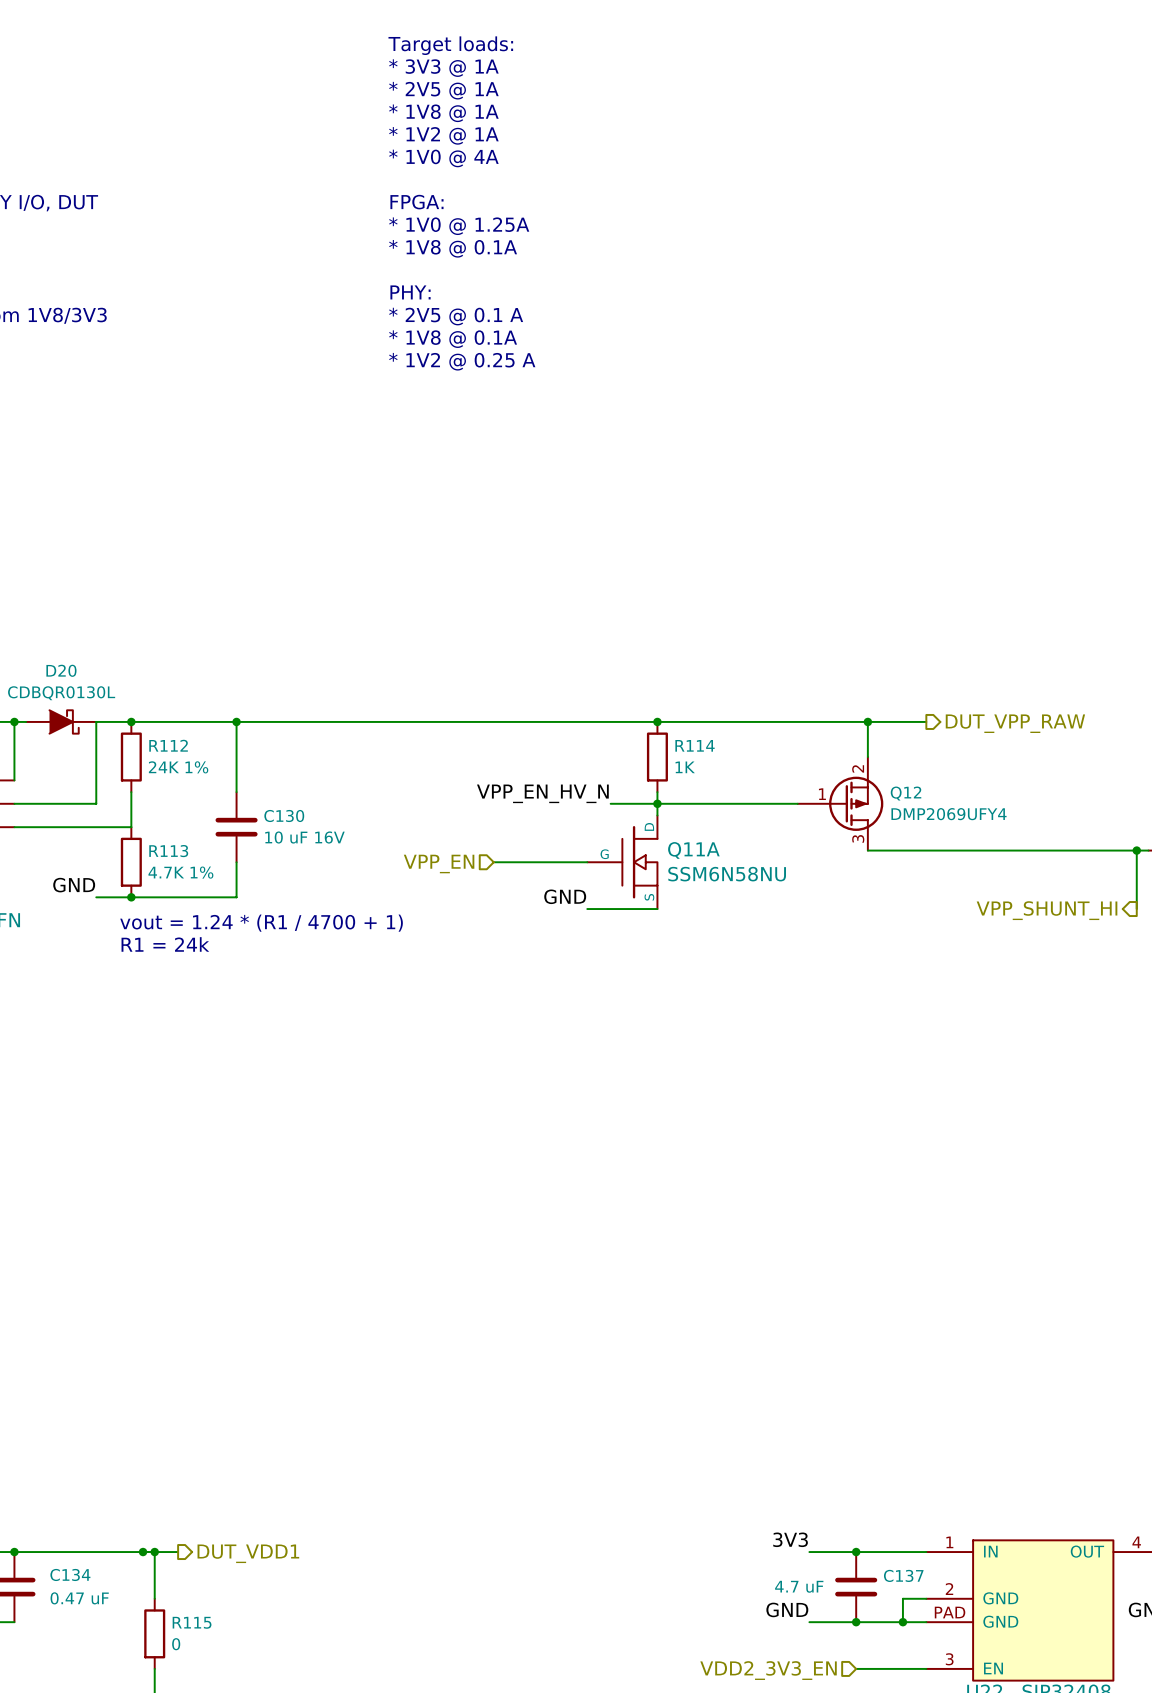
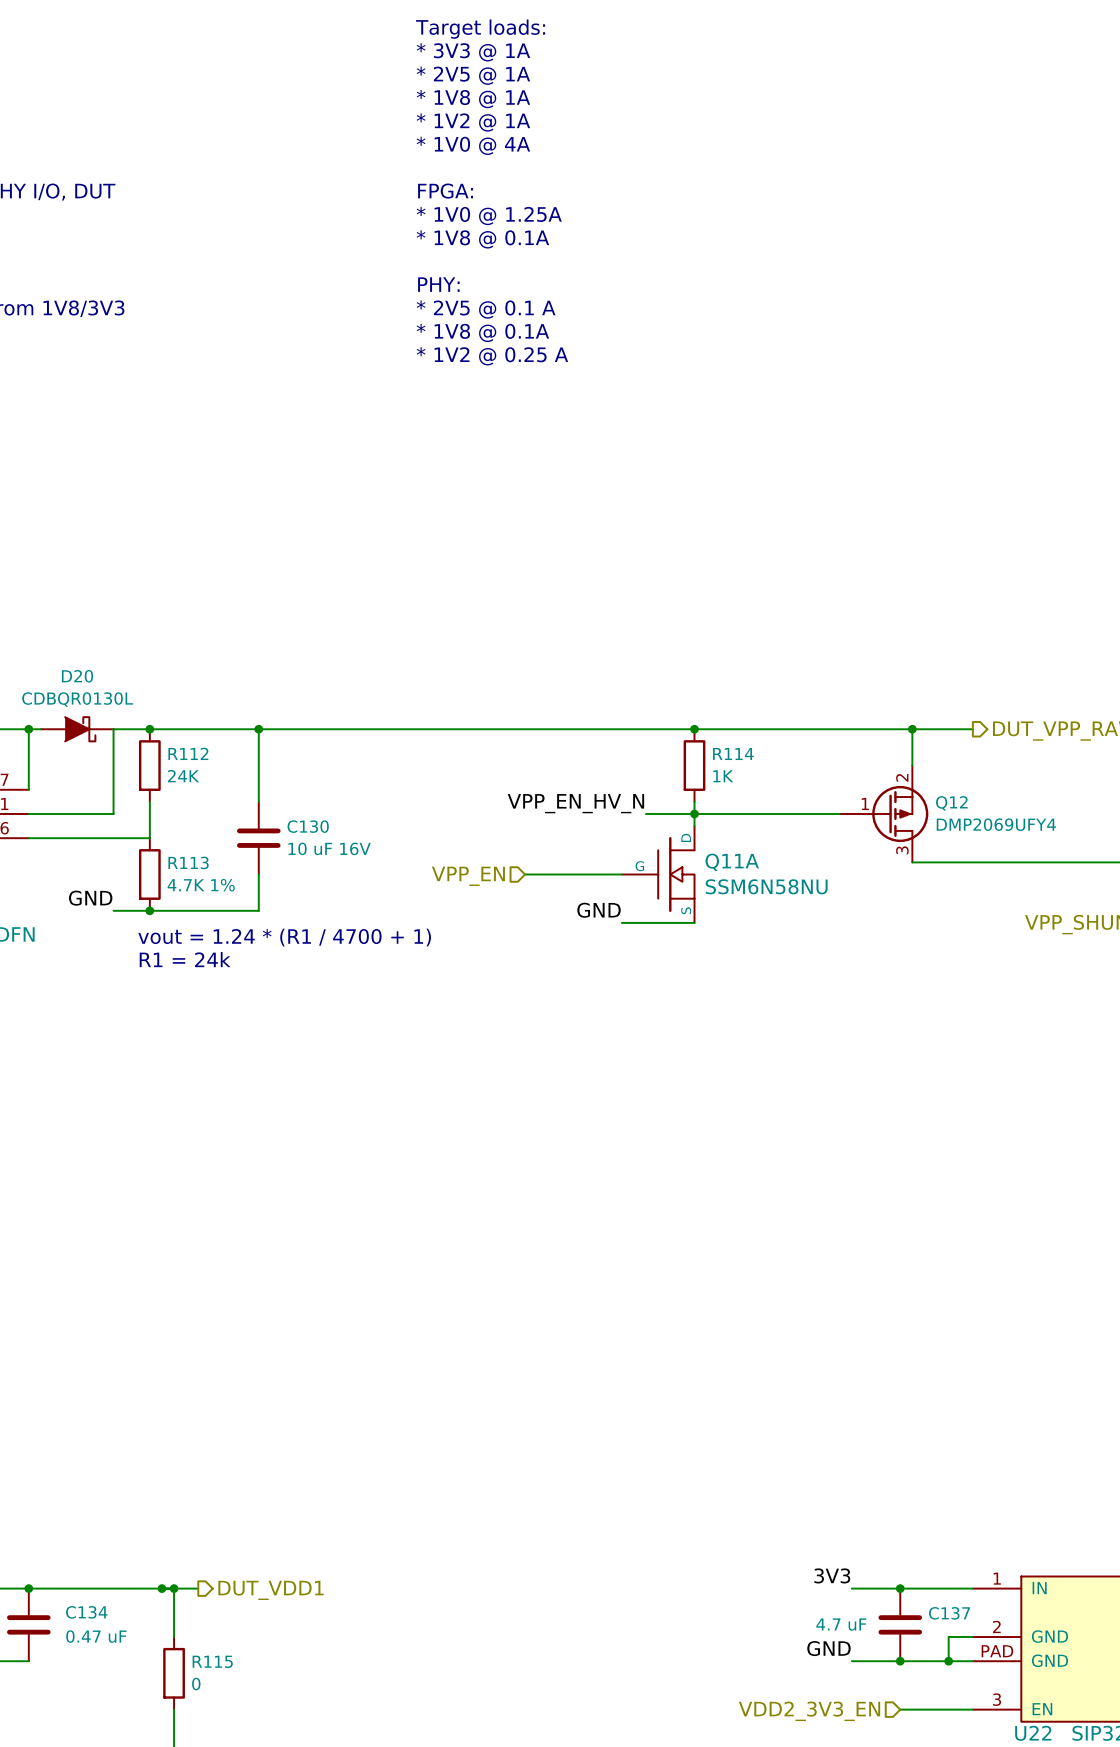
R112 value: 24K 1% (178, 767) -> 24K (183, 776)

